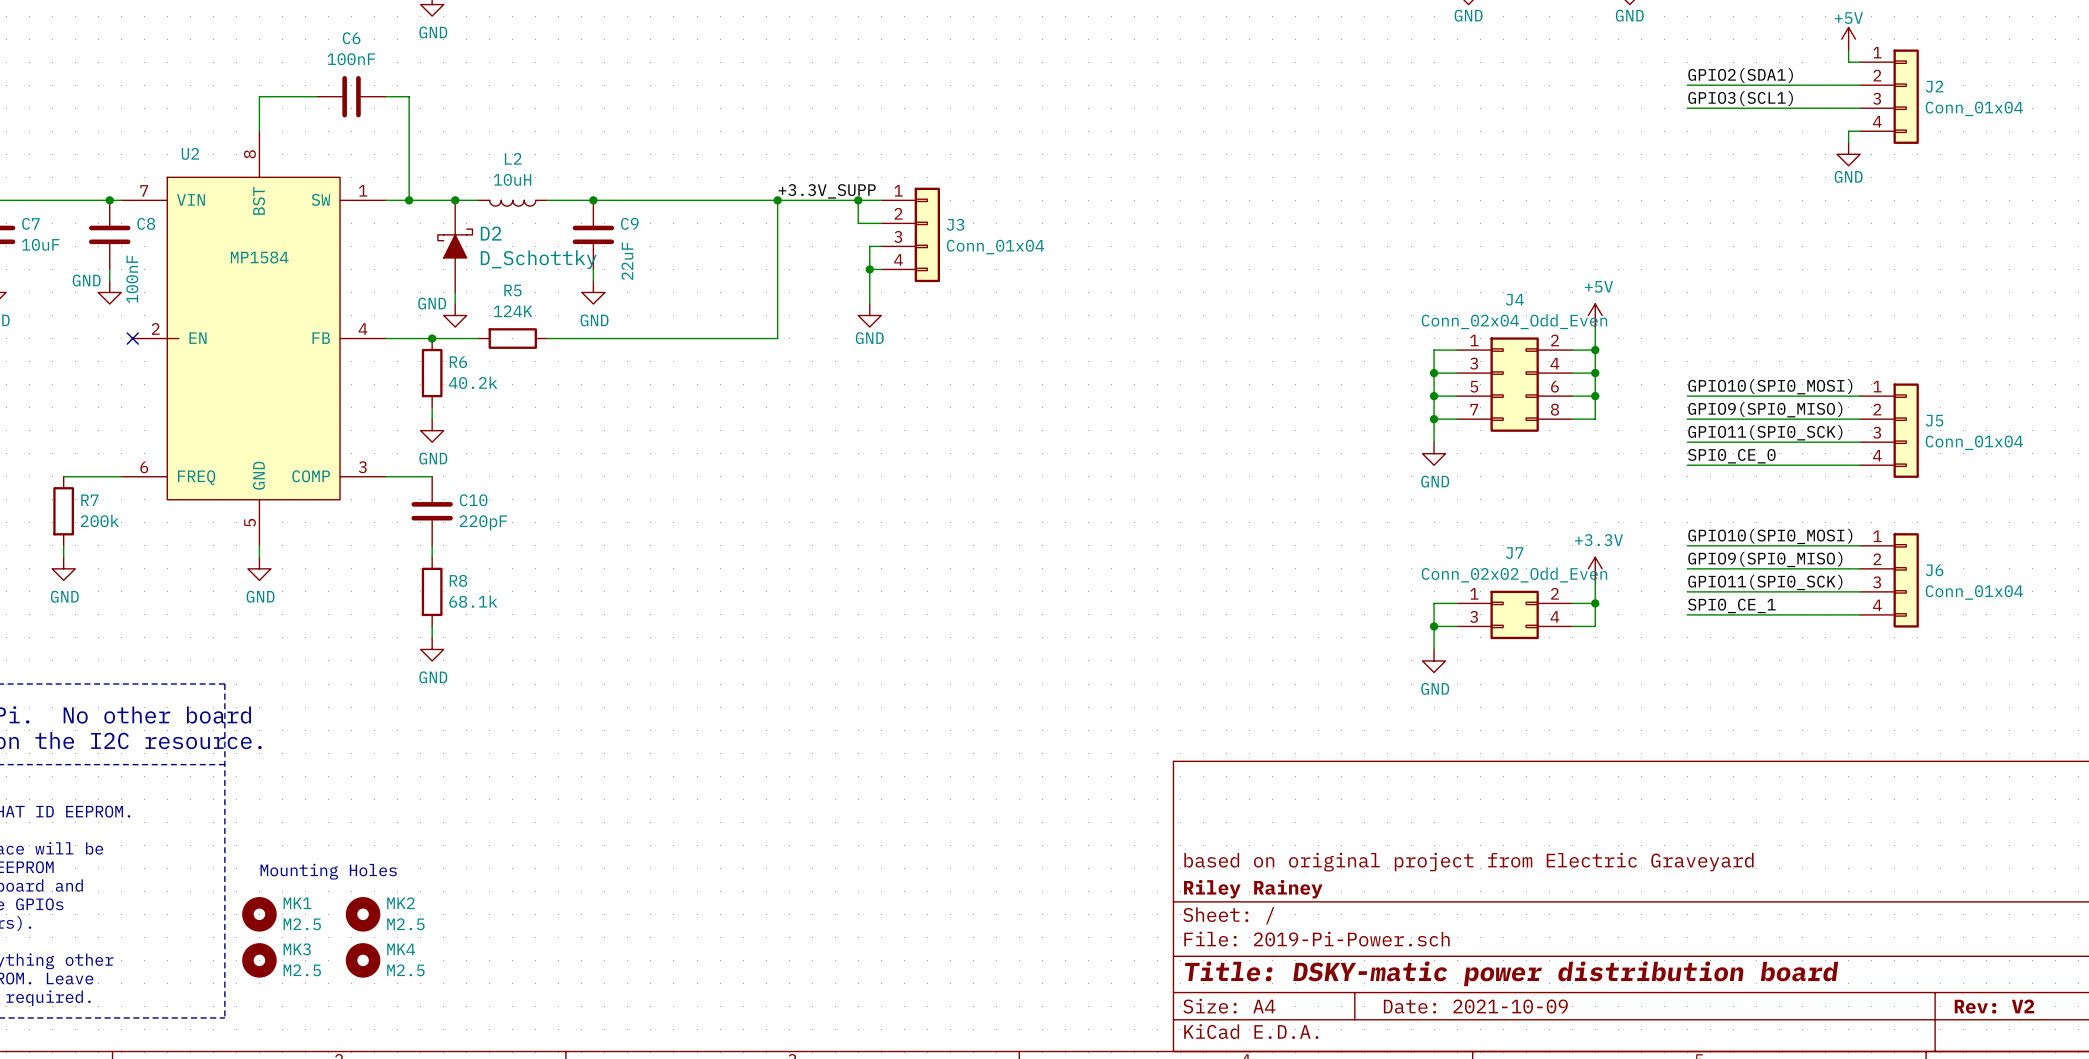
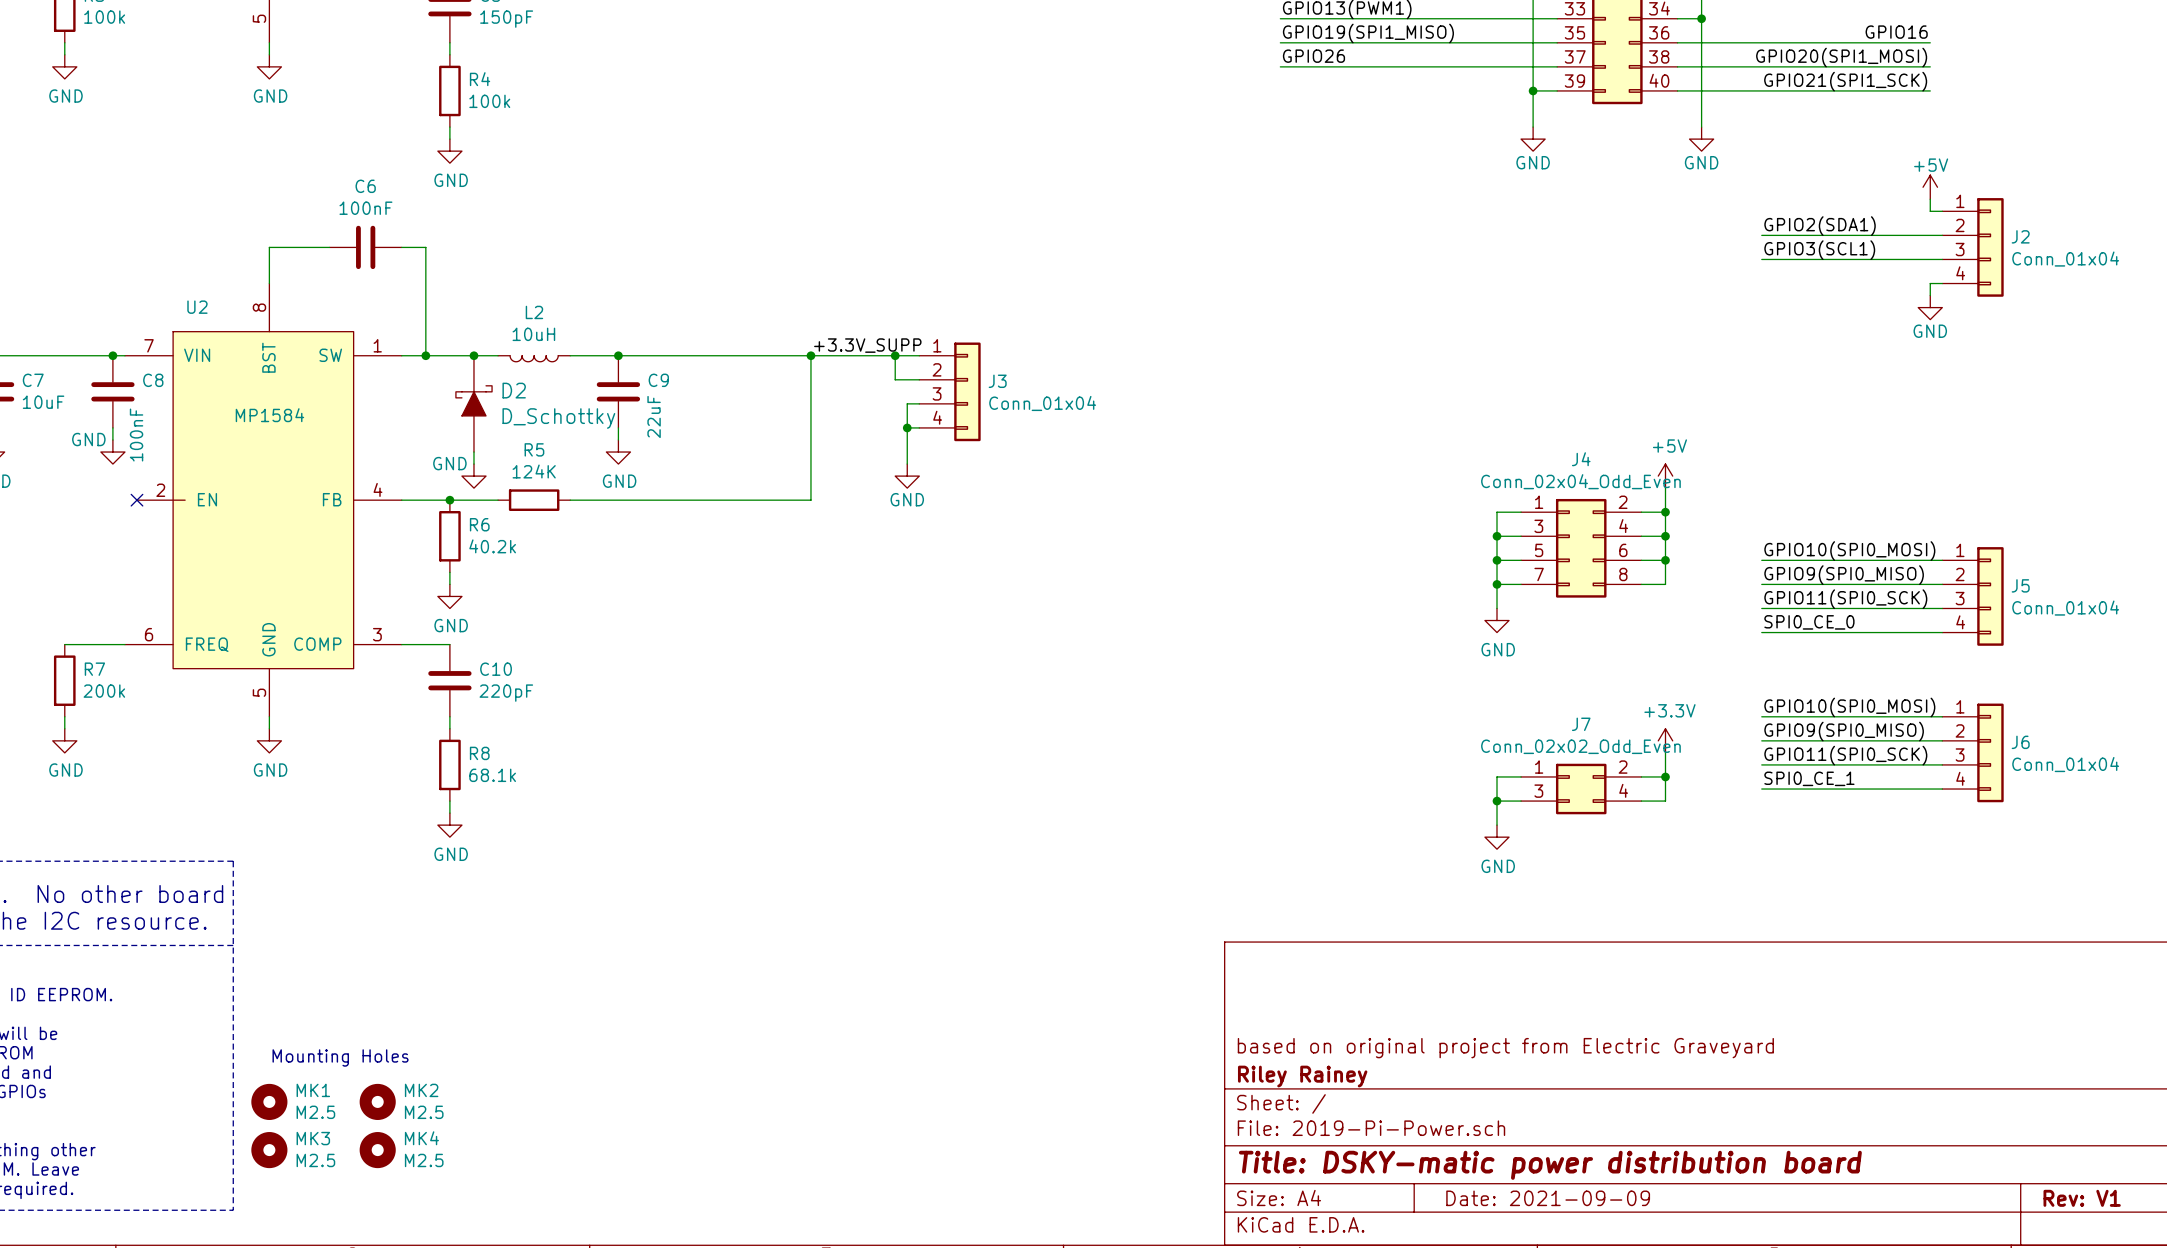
title block: Date: 2021-10-09 (1475, 1006) -> Date: 2021-09-09 (1548, 1198)
title block: Rev: V2 (1994, 1006) -> Rev: V1 (2082, 1198)

